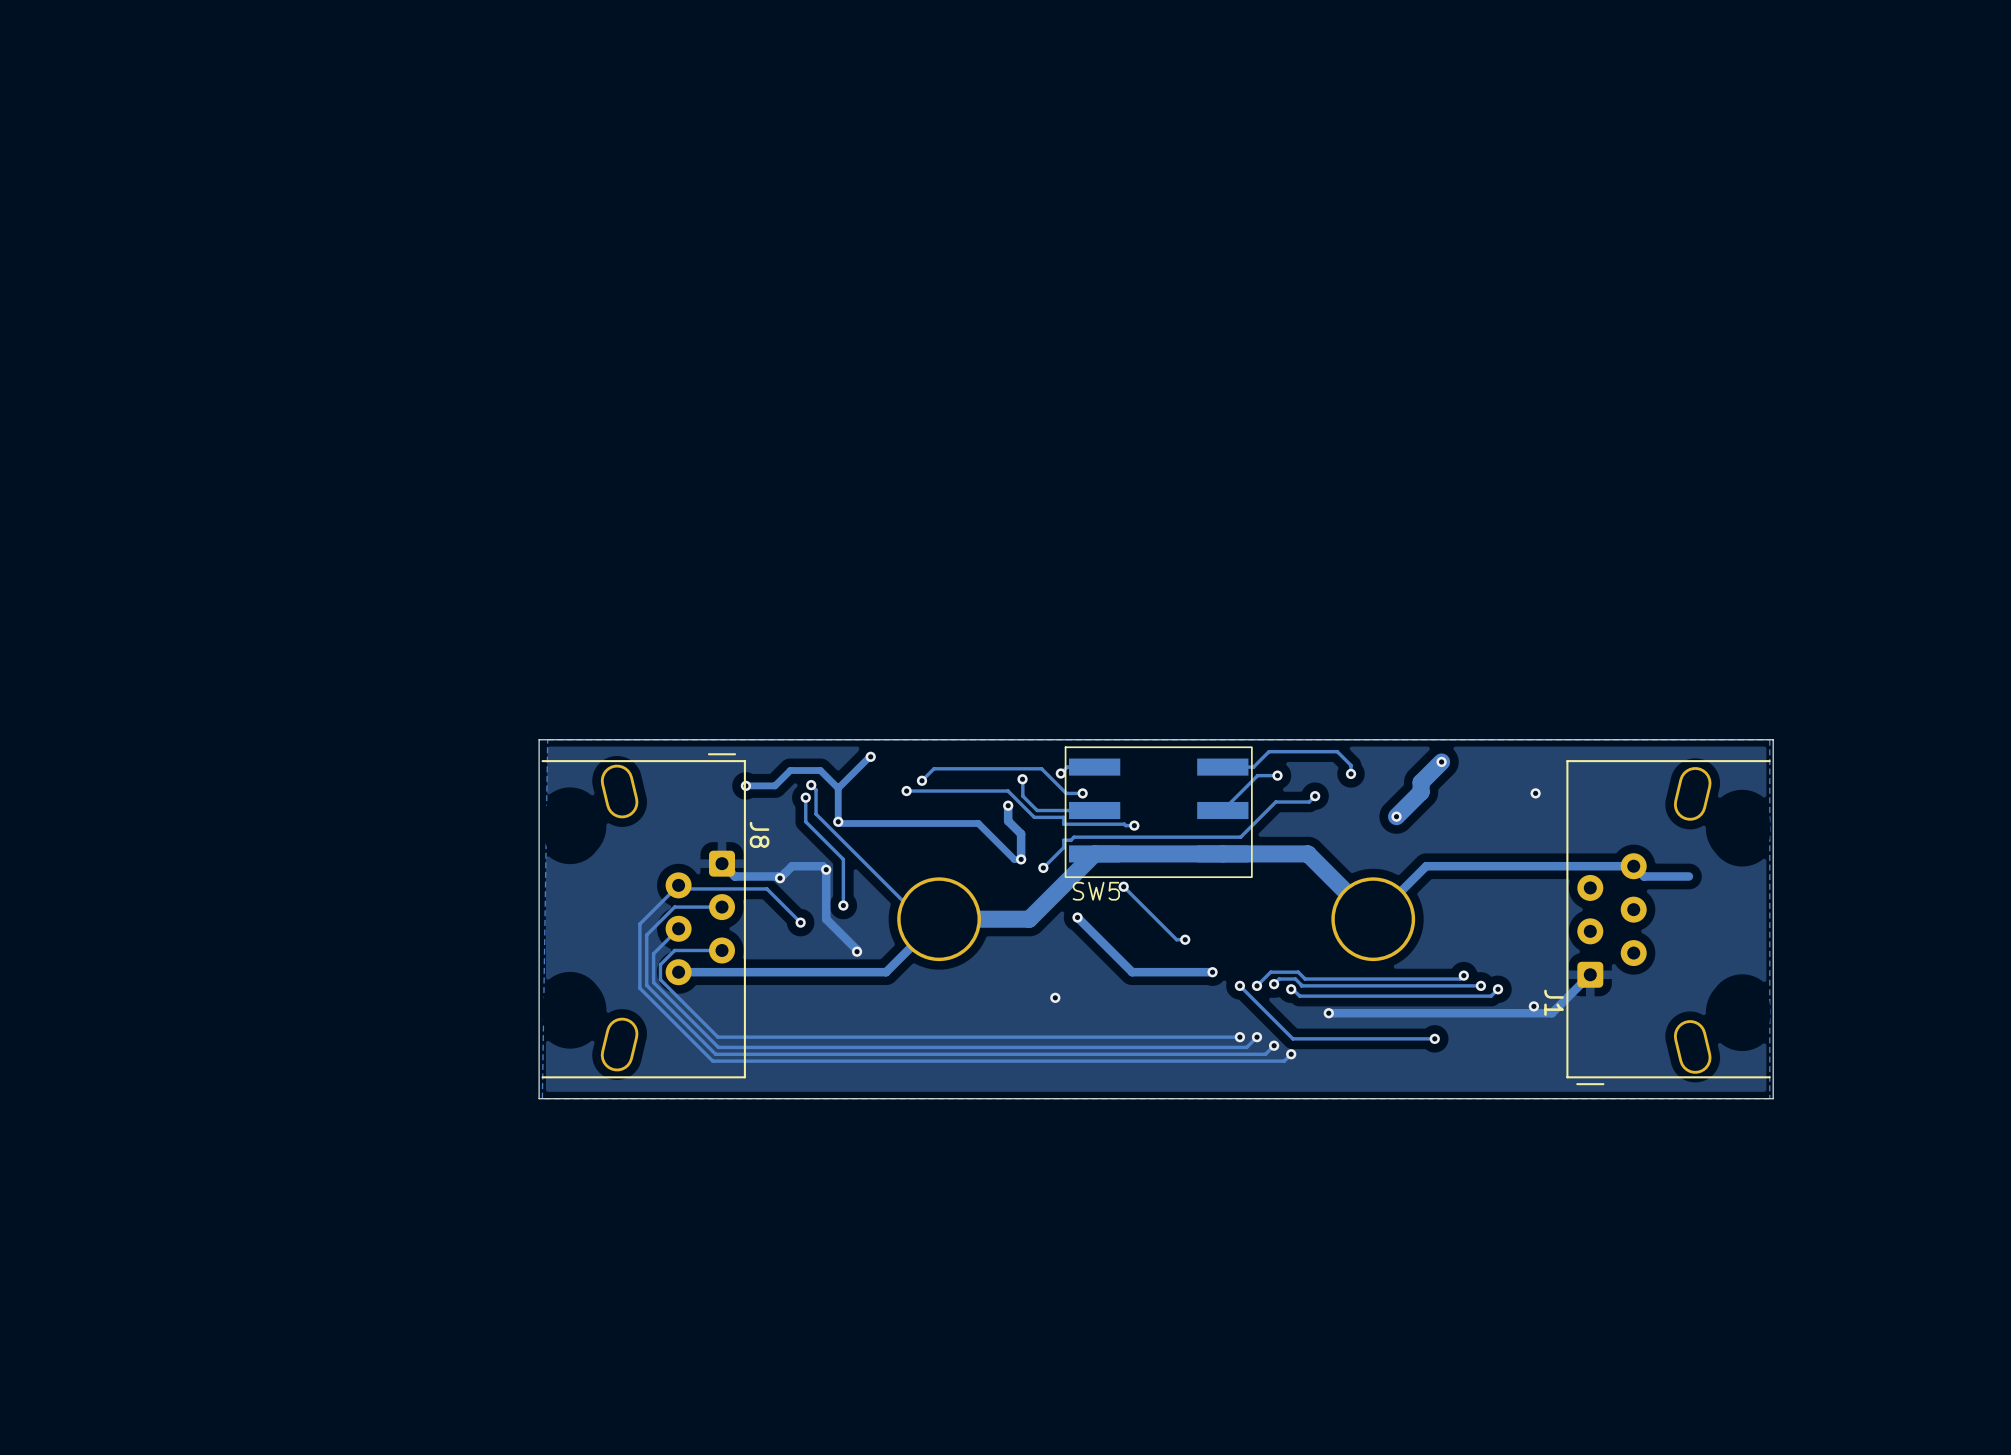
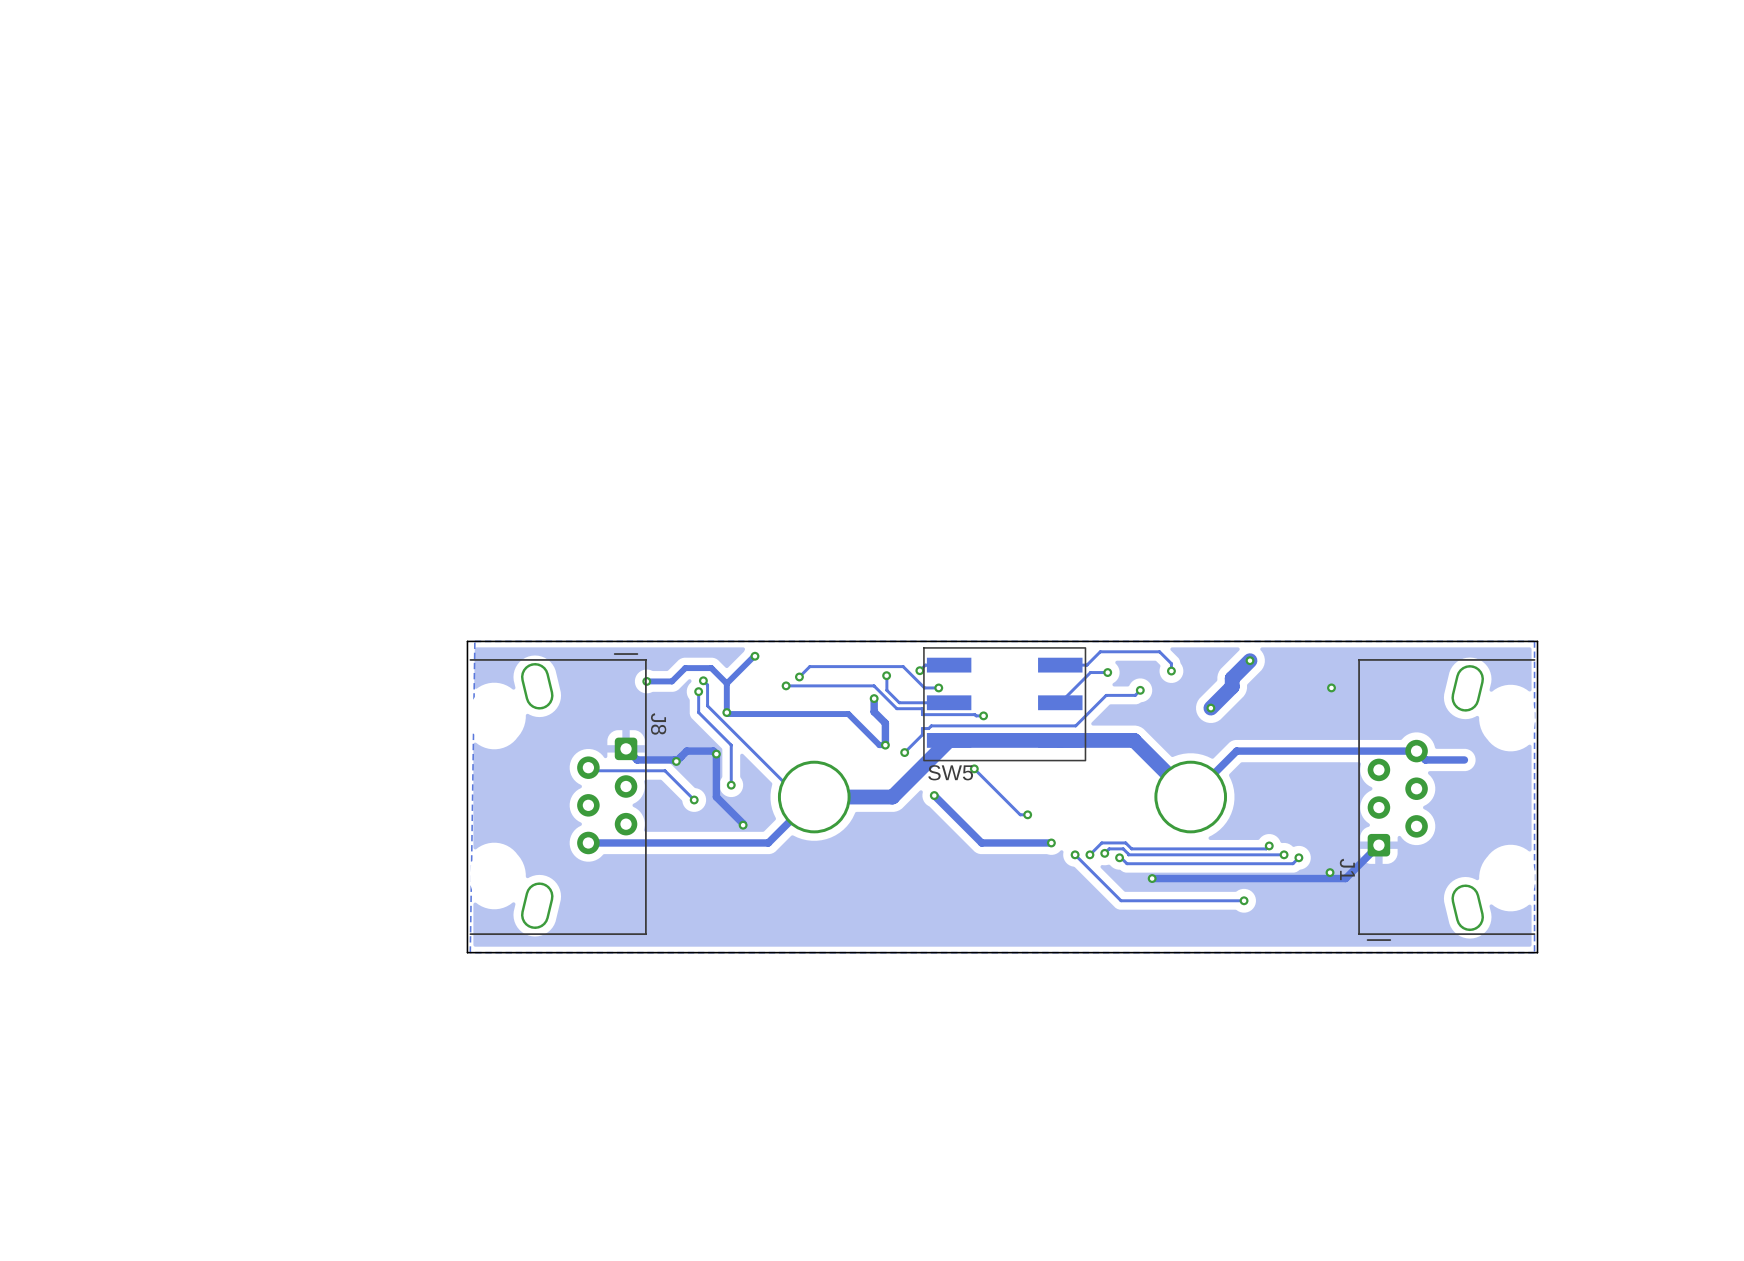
track: (678, 885) (639, 924) (639, 988) (712, 1061) (1284, 1061) (1291, 1054) -> none
track: (722, 907) (674, 907) (646, 934) (646, 985) (715, 1054) (1265, 1054) (1274, 1045) -> none
track: (678, 928) (653, 953) (653, 982) (718, 1047) (1246, 1047) (1257, 1037) -> none
track: (722, 950) (674, 950) (660, 964) (660, 979) (717, 1037) (1239, 1037) -> none
via: (1055, 997) -> none
via: (1239, 1037) -> none
via: (1257, 1037) -> none
via: (1274, 1045) -> none
via: (1291, 1054) -> none

